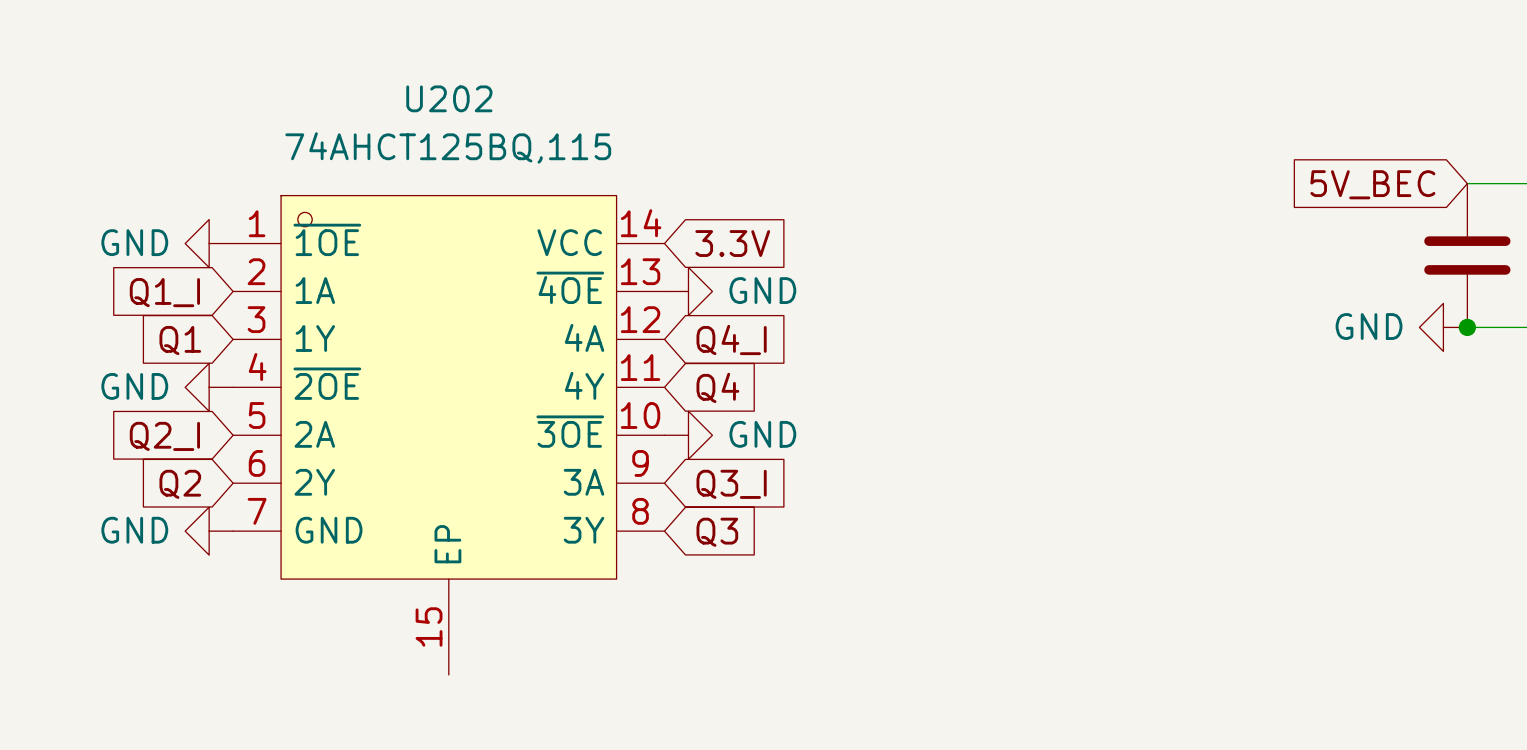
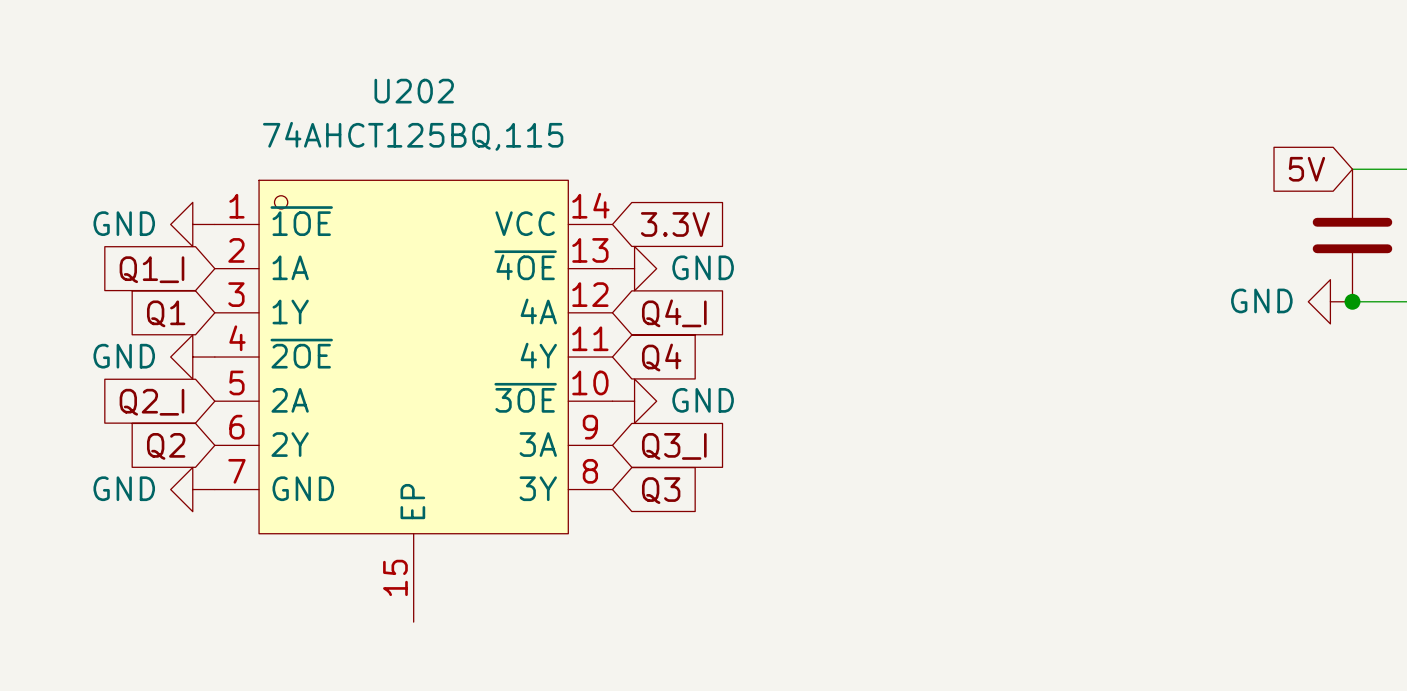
global label: 5V_BEC (1372, 184) -> 5V (1306, 169)

